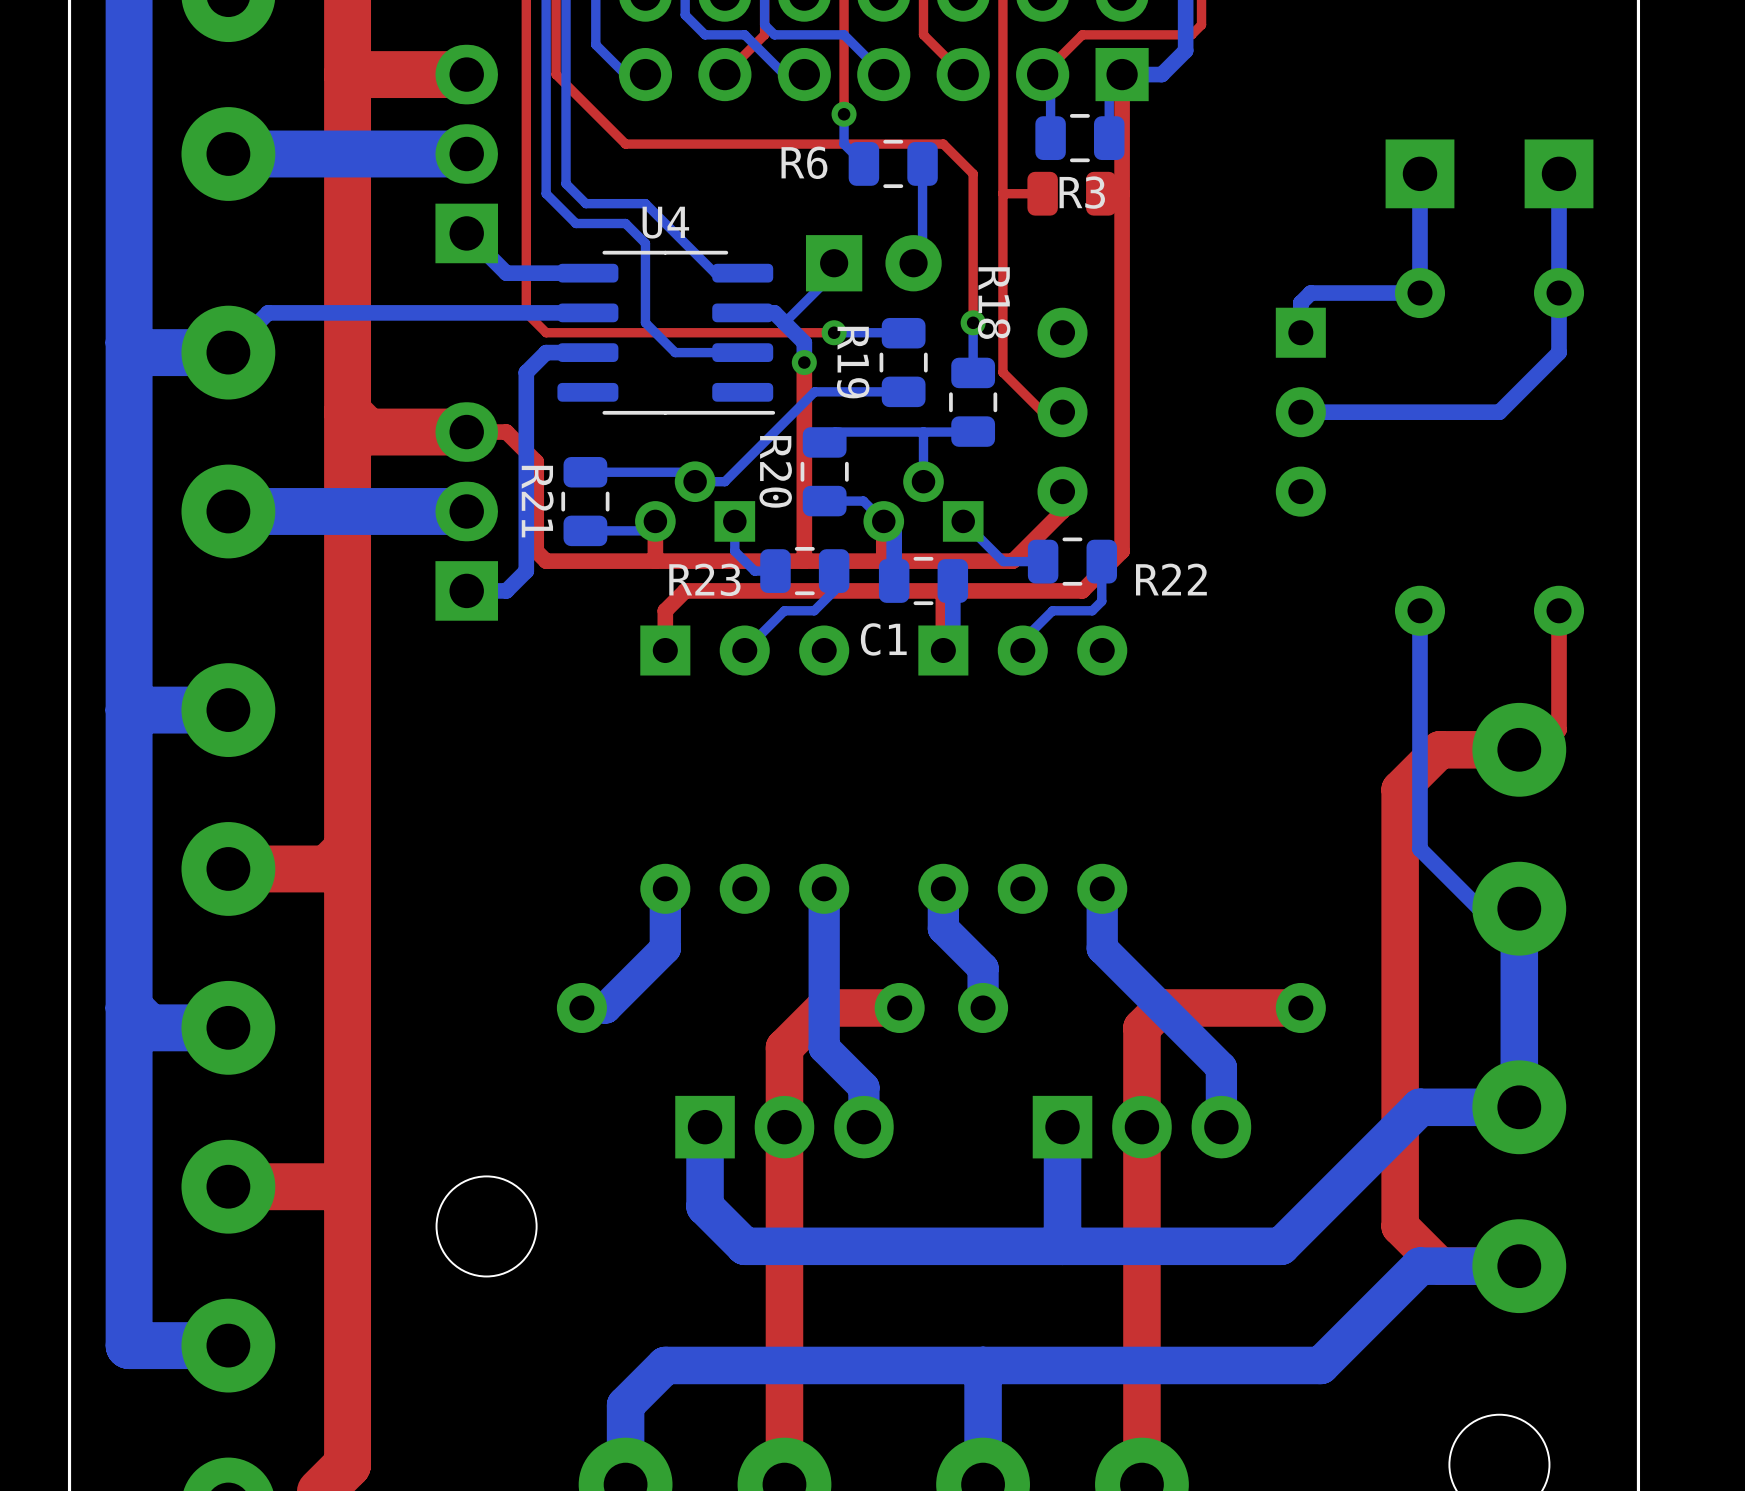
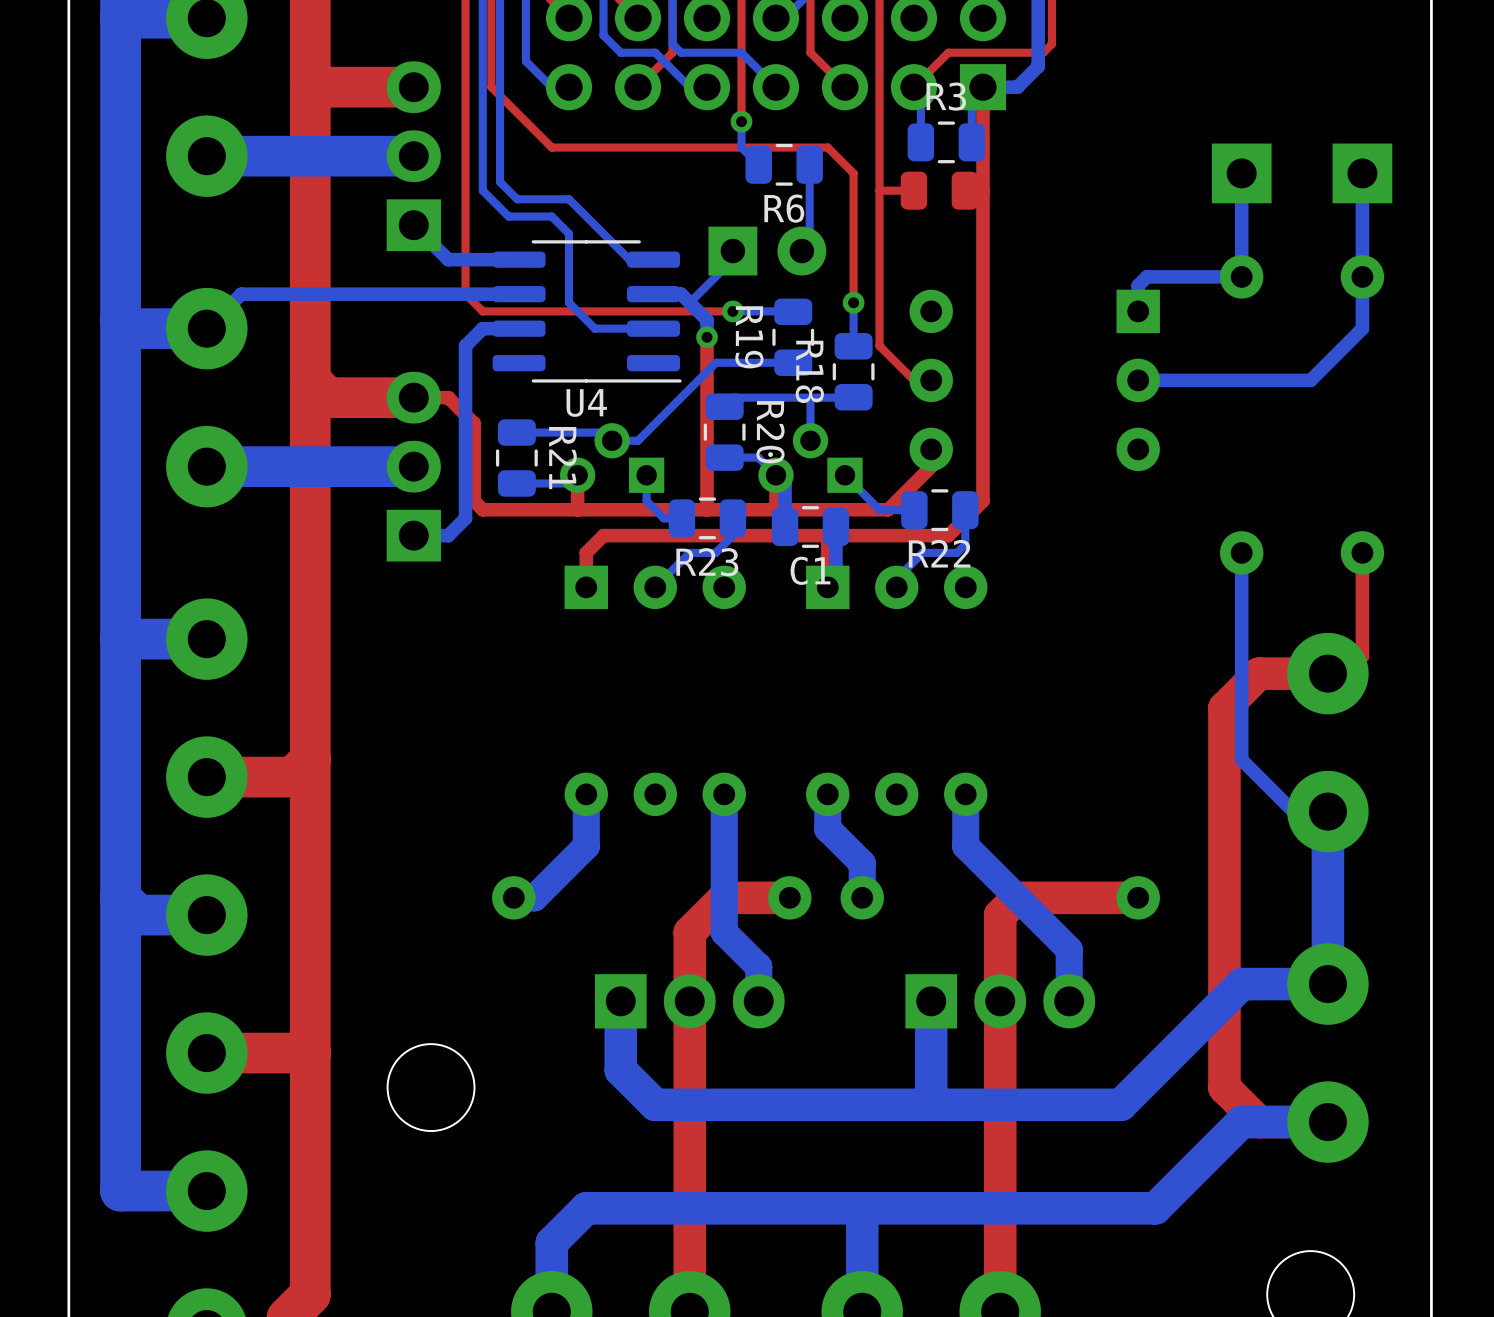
R6 name position: R6 (804, 162) -> R6 (784, 208)
R3 name position: R3 (1082, 192) -> R3 (946, 96)
U4 name position: U4 (665, 222) -> U4 (586, 403)
R18 name position: R18 (994, 303) -> R18 (809, 371)
R20 name position: R20 (775, 471) -> R20 (770, 432)
R21 name position: R21 (537, 501) -> R21 (562, 458)
R23 name position: R23 (704, 579) -> R23 (707, 562)
R22 name position: R22 (1171, 579) -> R22 (939, 553)
C1 name position: C1 (883, 639) -> C1 (810, 570)

